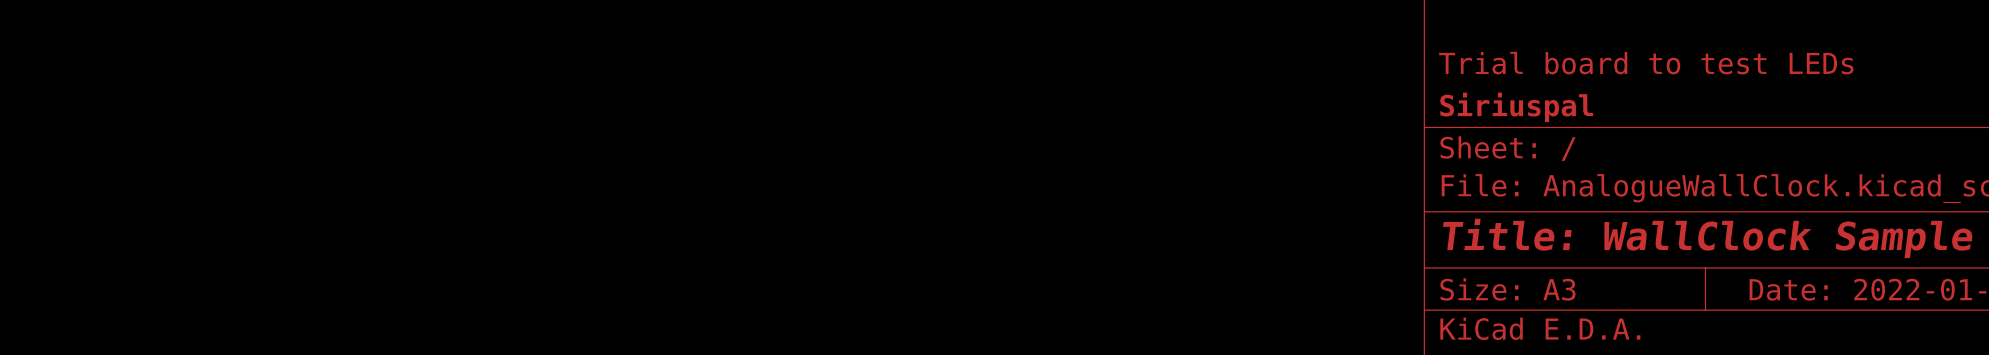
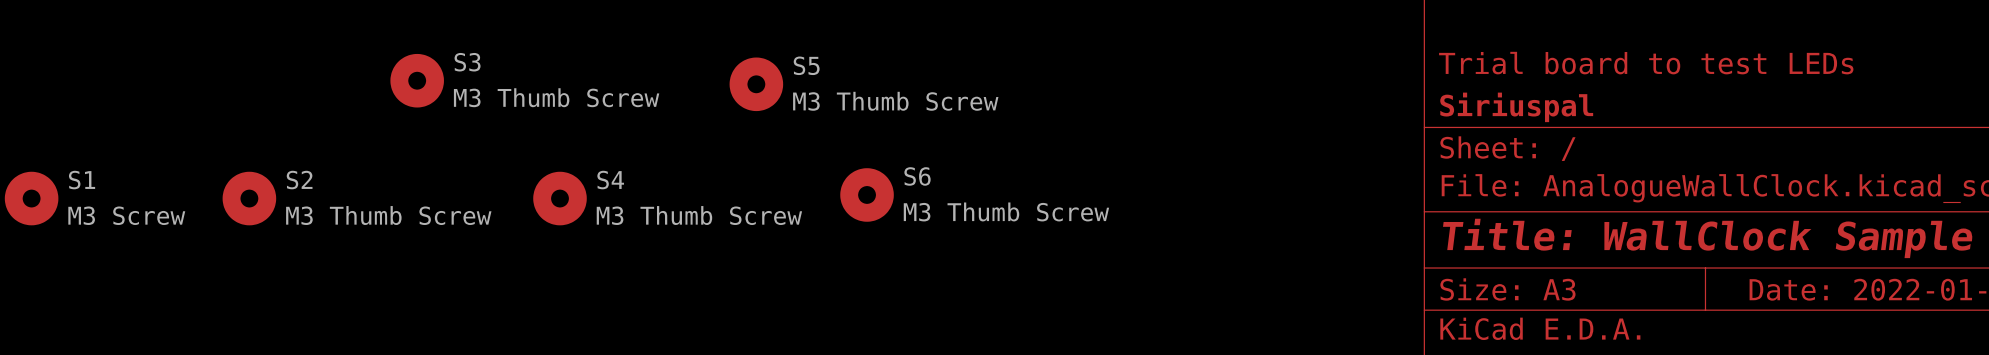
S3: none -> M3 Thumb Screw (417, 80)
S5: none -> M3 Thumb Screw (756, 84)
S6: none -> M3 Thumb Screw (867, 194)
S1: none -> M3 Screw (31, 198)
S2: none -> M3 Thumb Screw (249, 198)
S4: none -> M3 Thumb Screw (560, 198)

